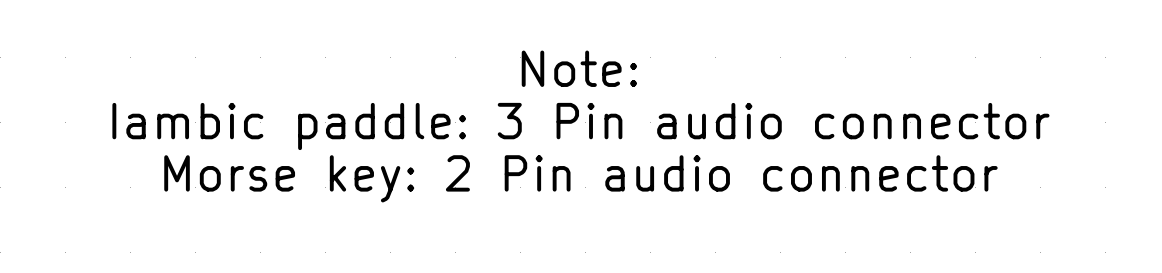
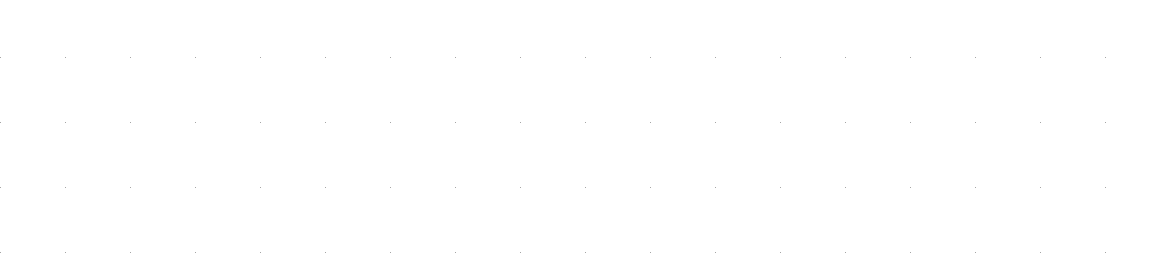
text: Note: (579, 68) -> none
text: Iambic paddle: 3 Pin audio connector (580, 126) -> none
text: Morse key: 2 Pin audio connector (580, 178) -> none

